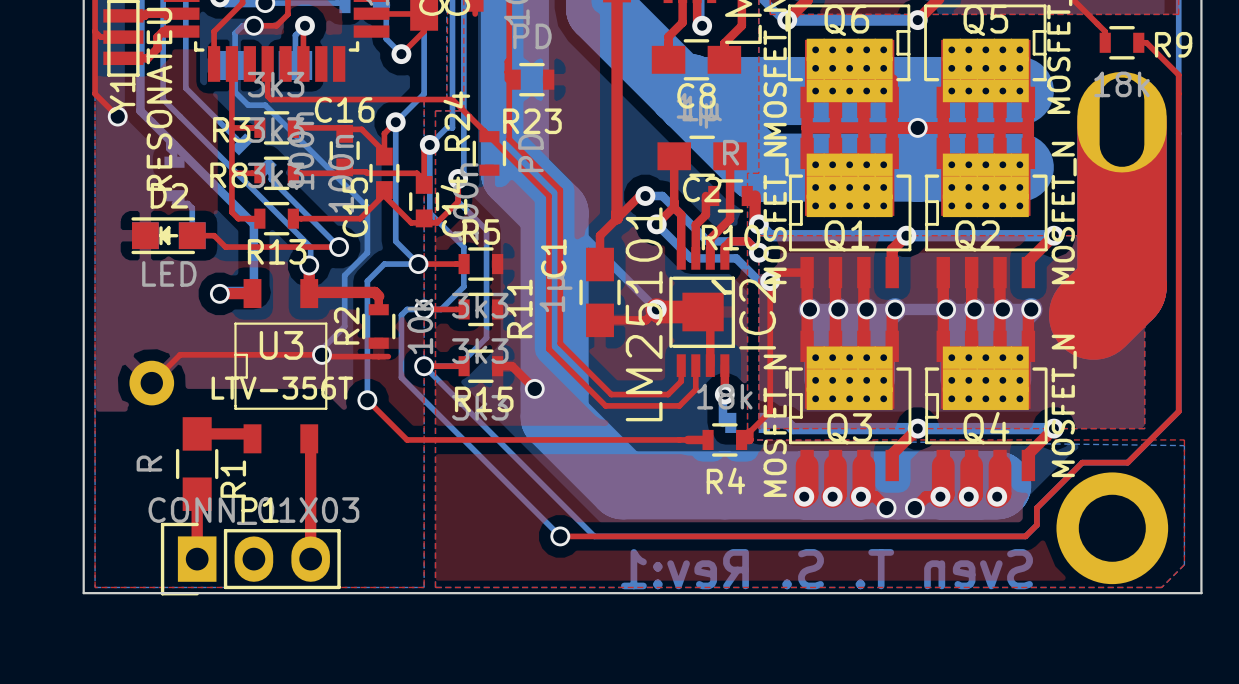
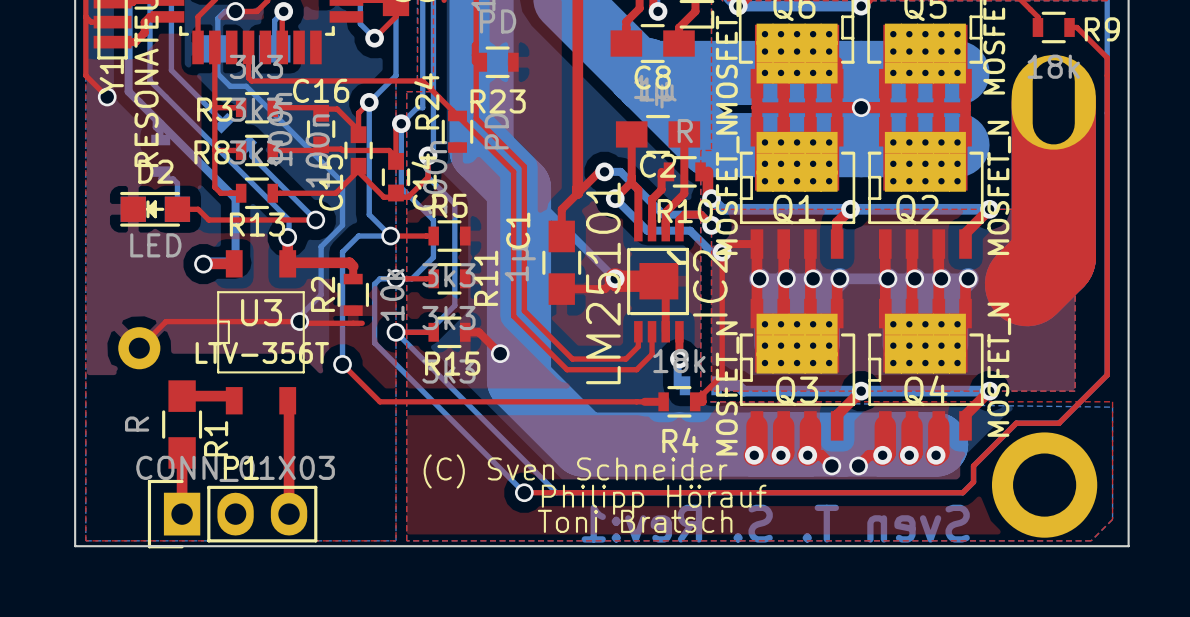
text: none -> (C) Sven Schneider (575, 471)
text: none -> Philipp Hörauf (654, 499)
text: none -> Toni Bratsch (635, 521)

